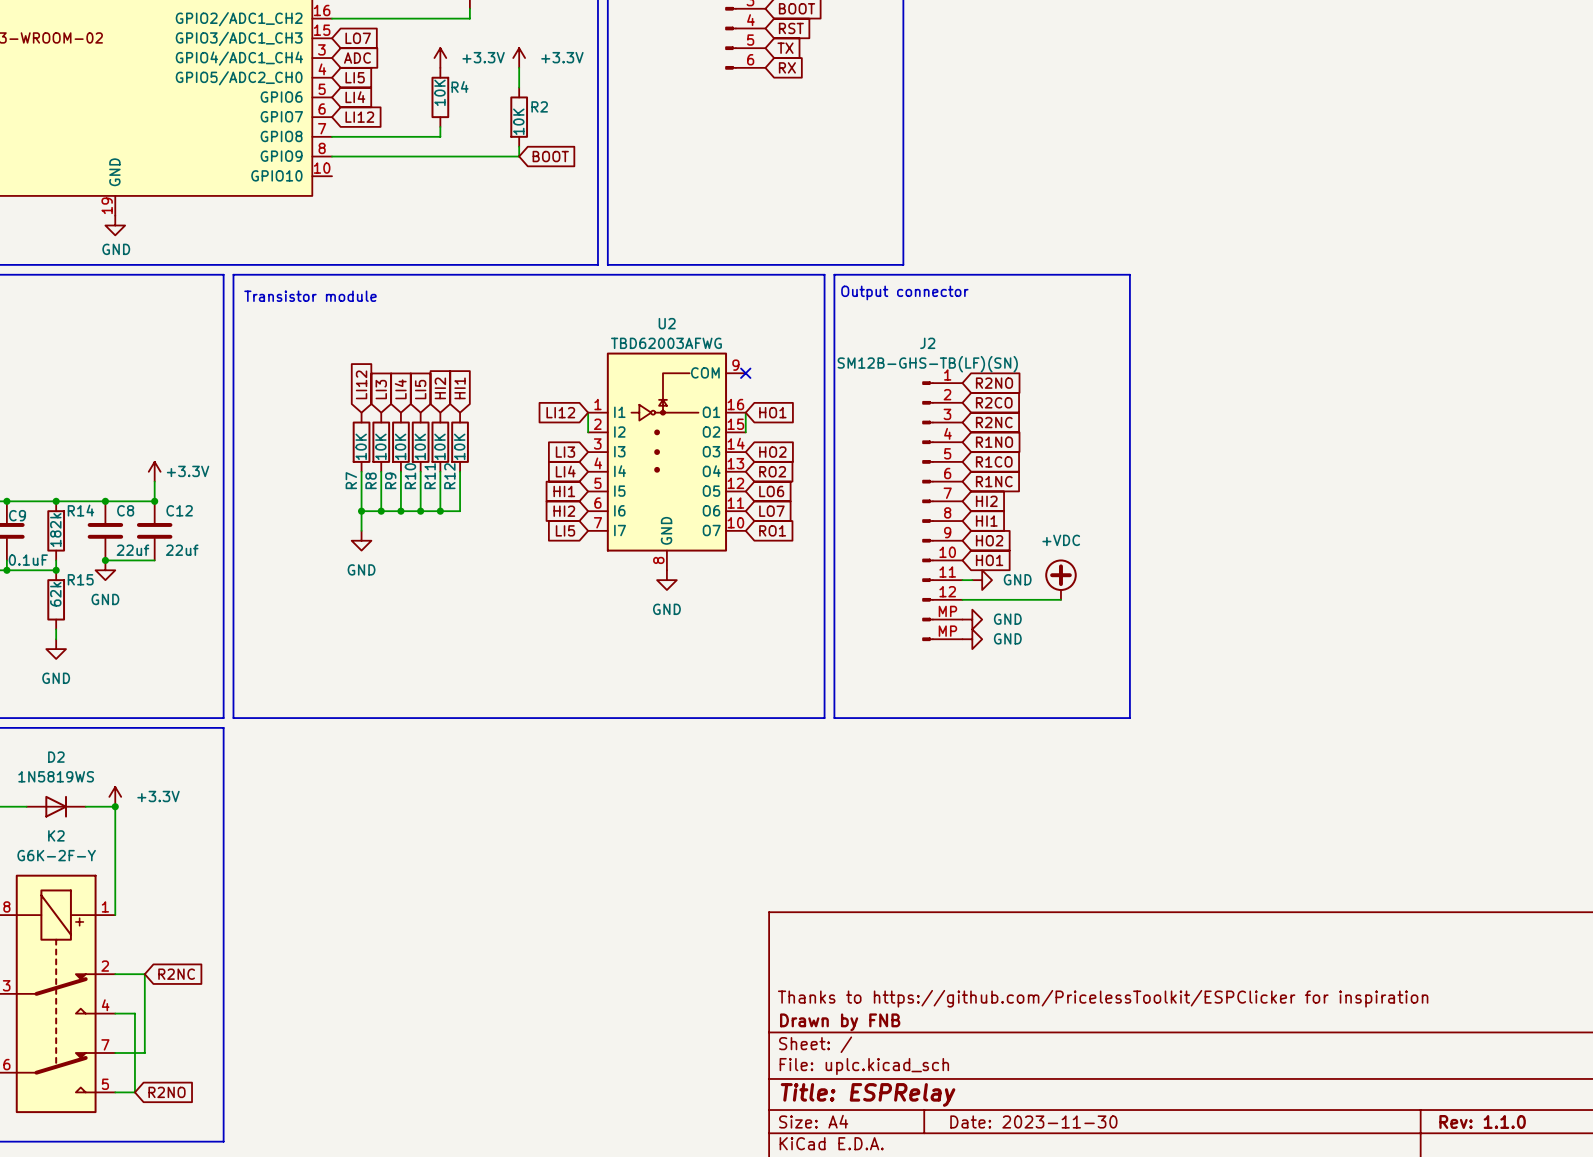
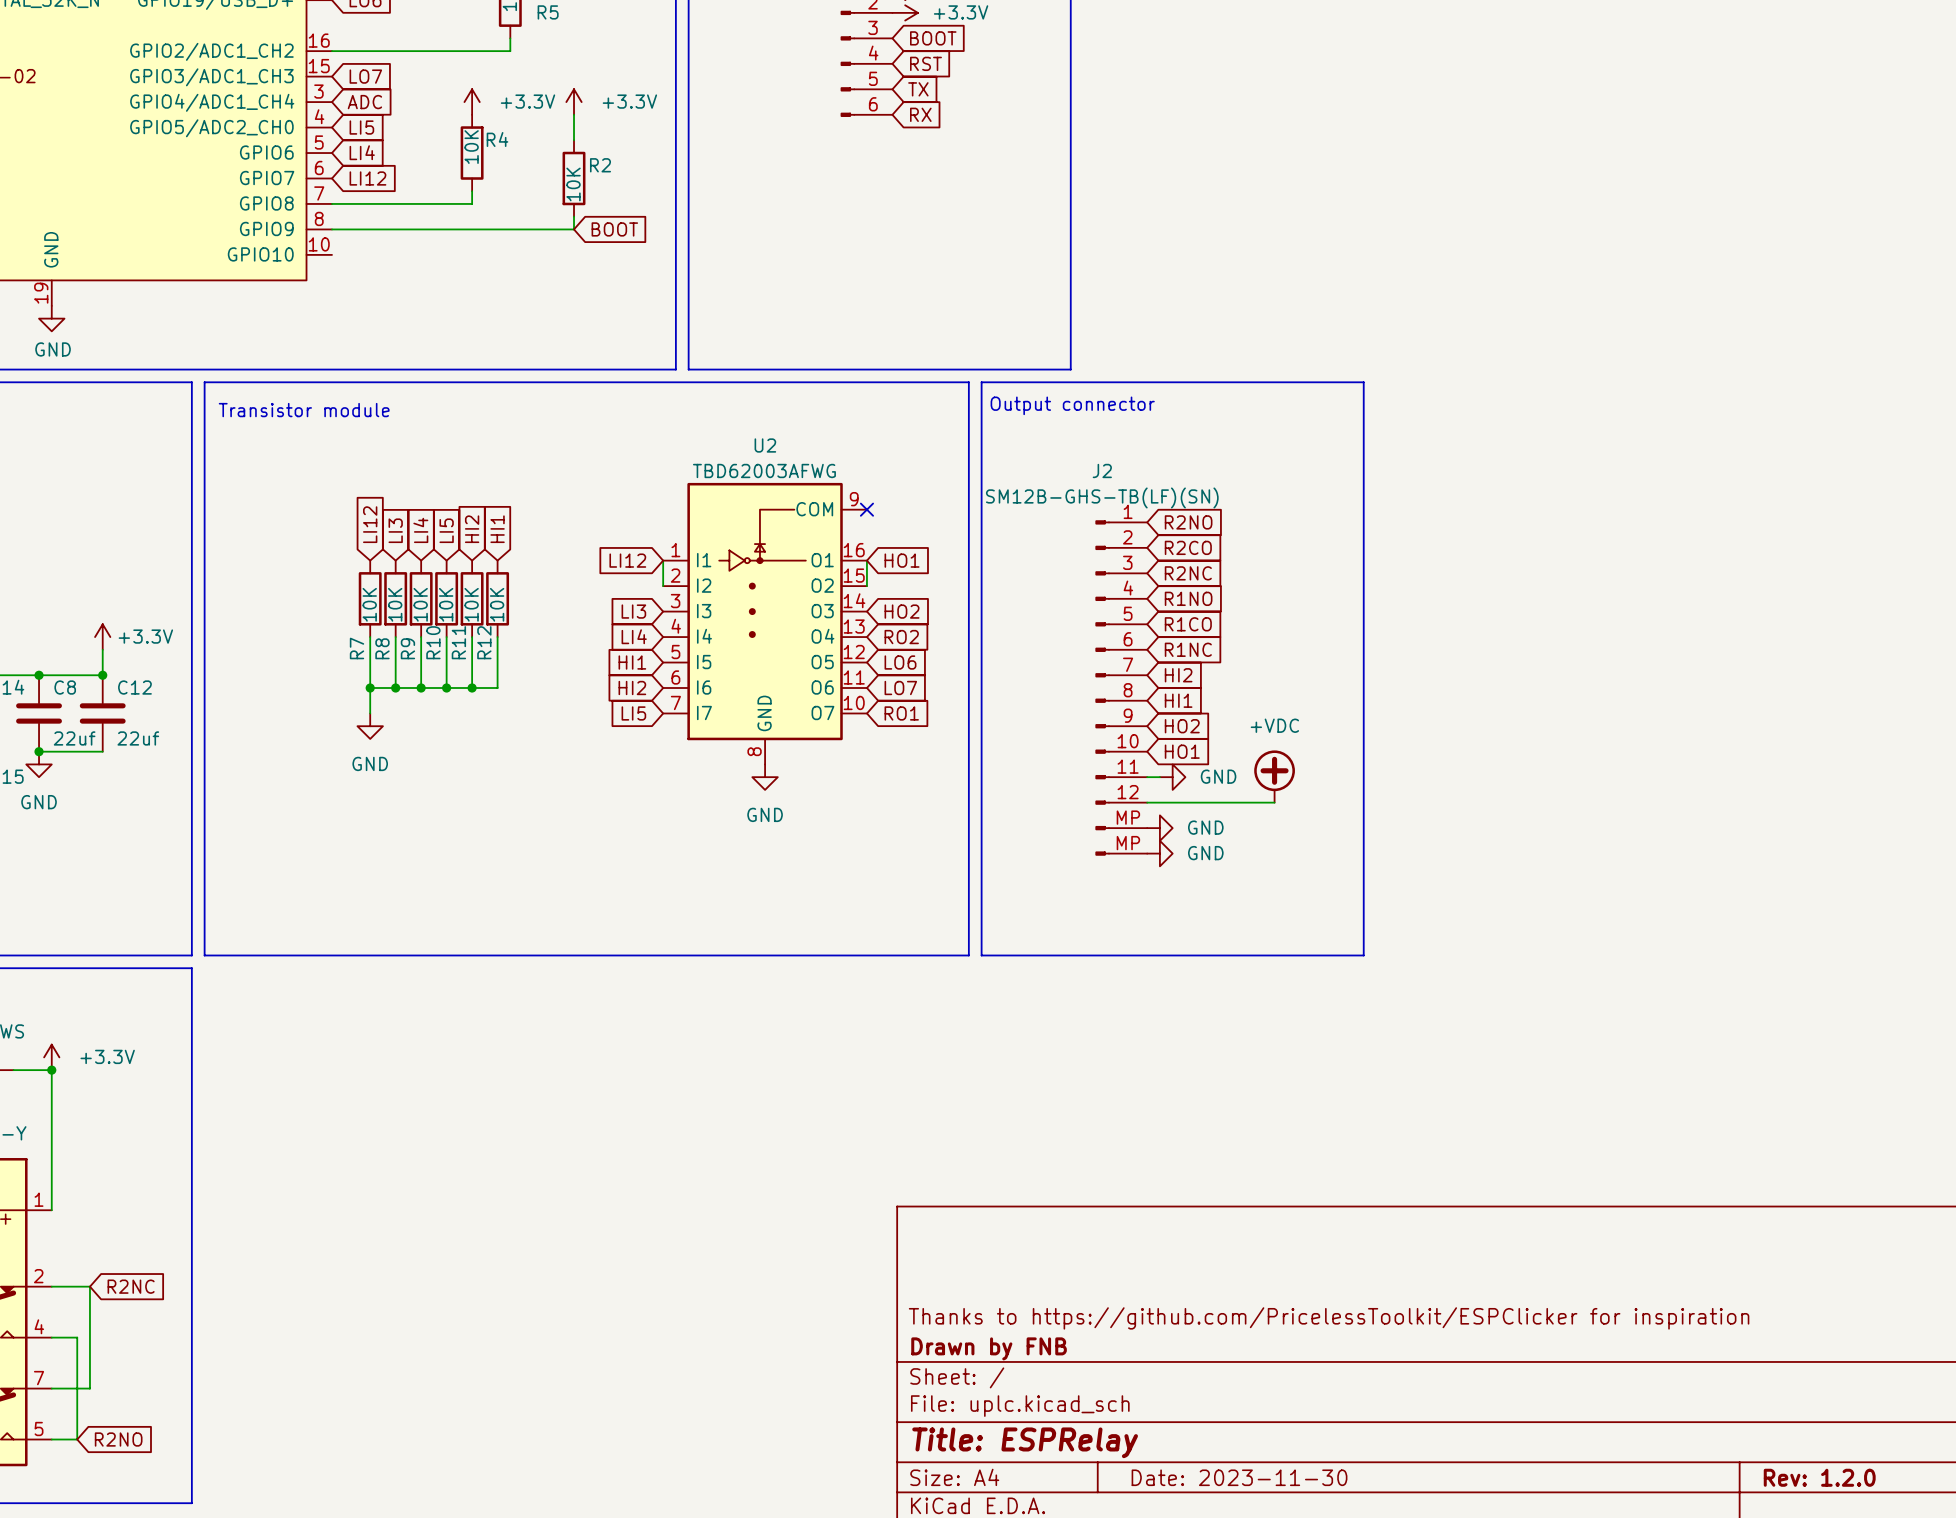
title block: Rev: 1.1.0 (1482, 1121) -> Rev: 1.2.0 (1819, 1477)

